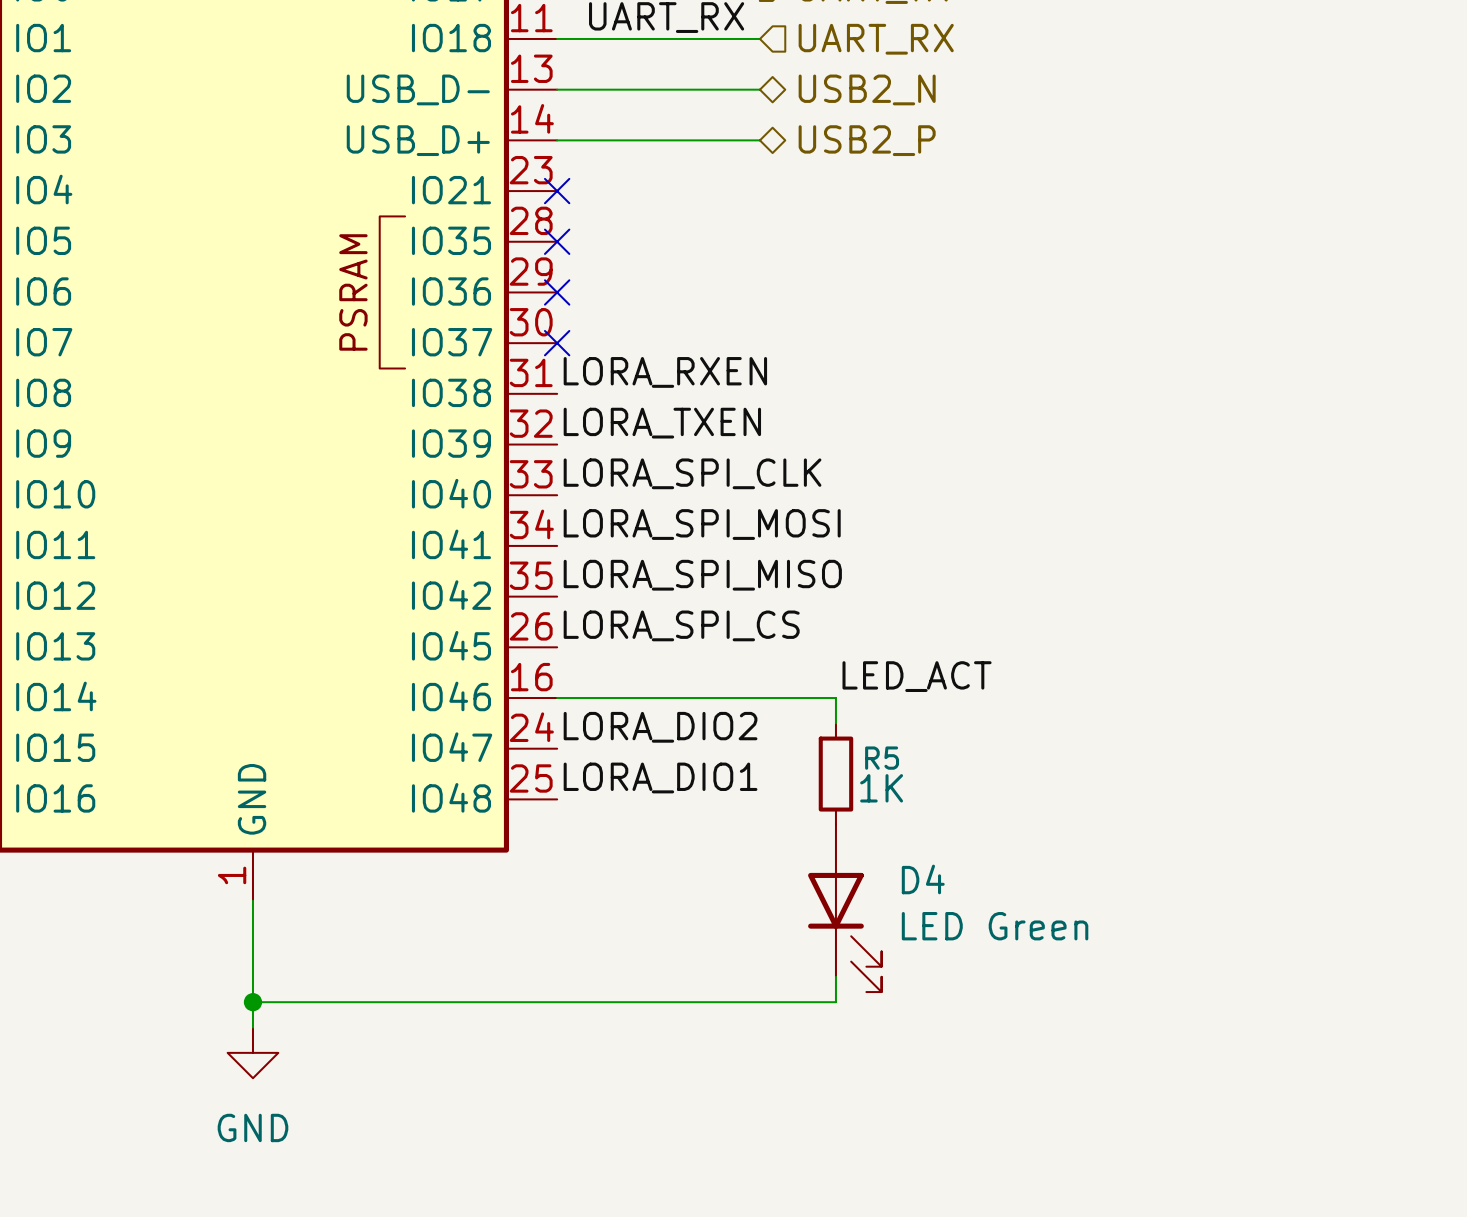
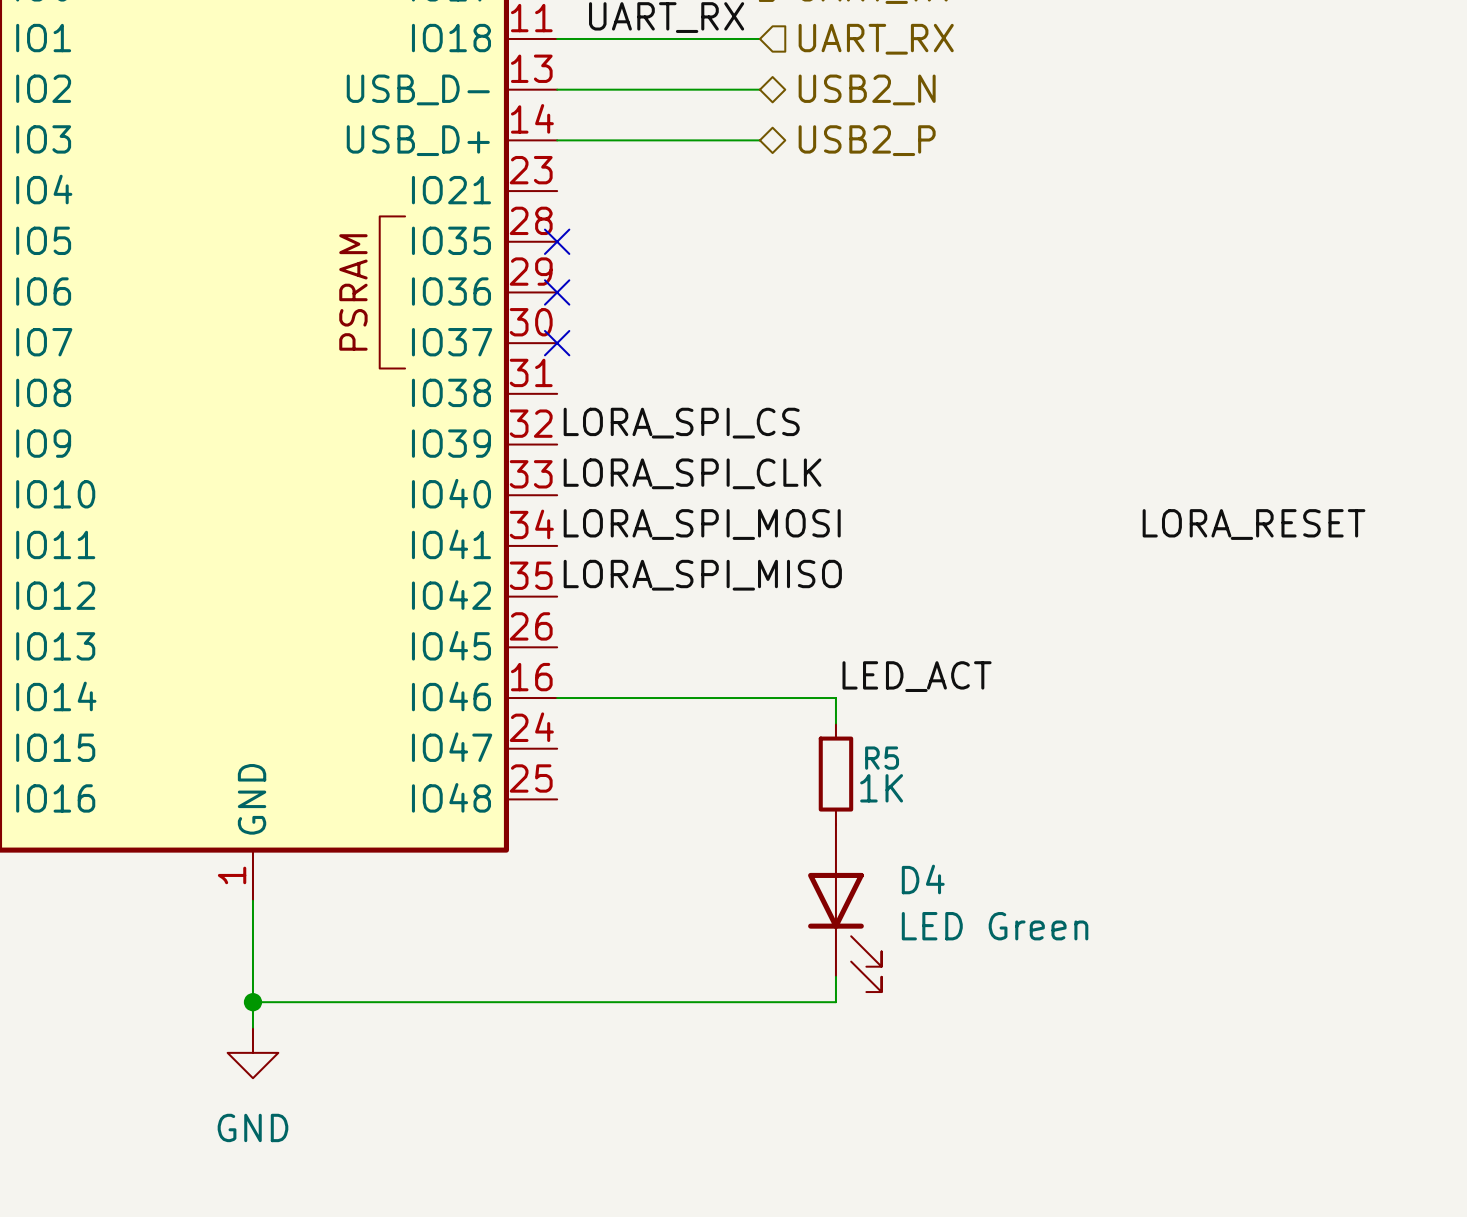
no-connect mark: (557, 191) -> none
label: LORA_RXEN (665, 372) -> none
label: LORA_TXEN (662, 423) -> LORA_SPI_CS (681, 423)
label: none -> LORA_RESET (1254, 524)
label: LORA_SPI_CS (681, 625) -> none
label: LORA_DIO2 (660, 727) -> none
label: LORA_DIO1 (660, 777) -> none

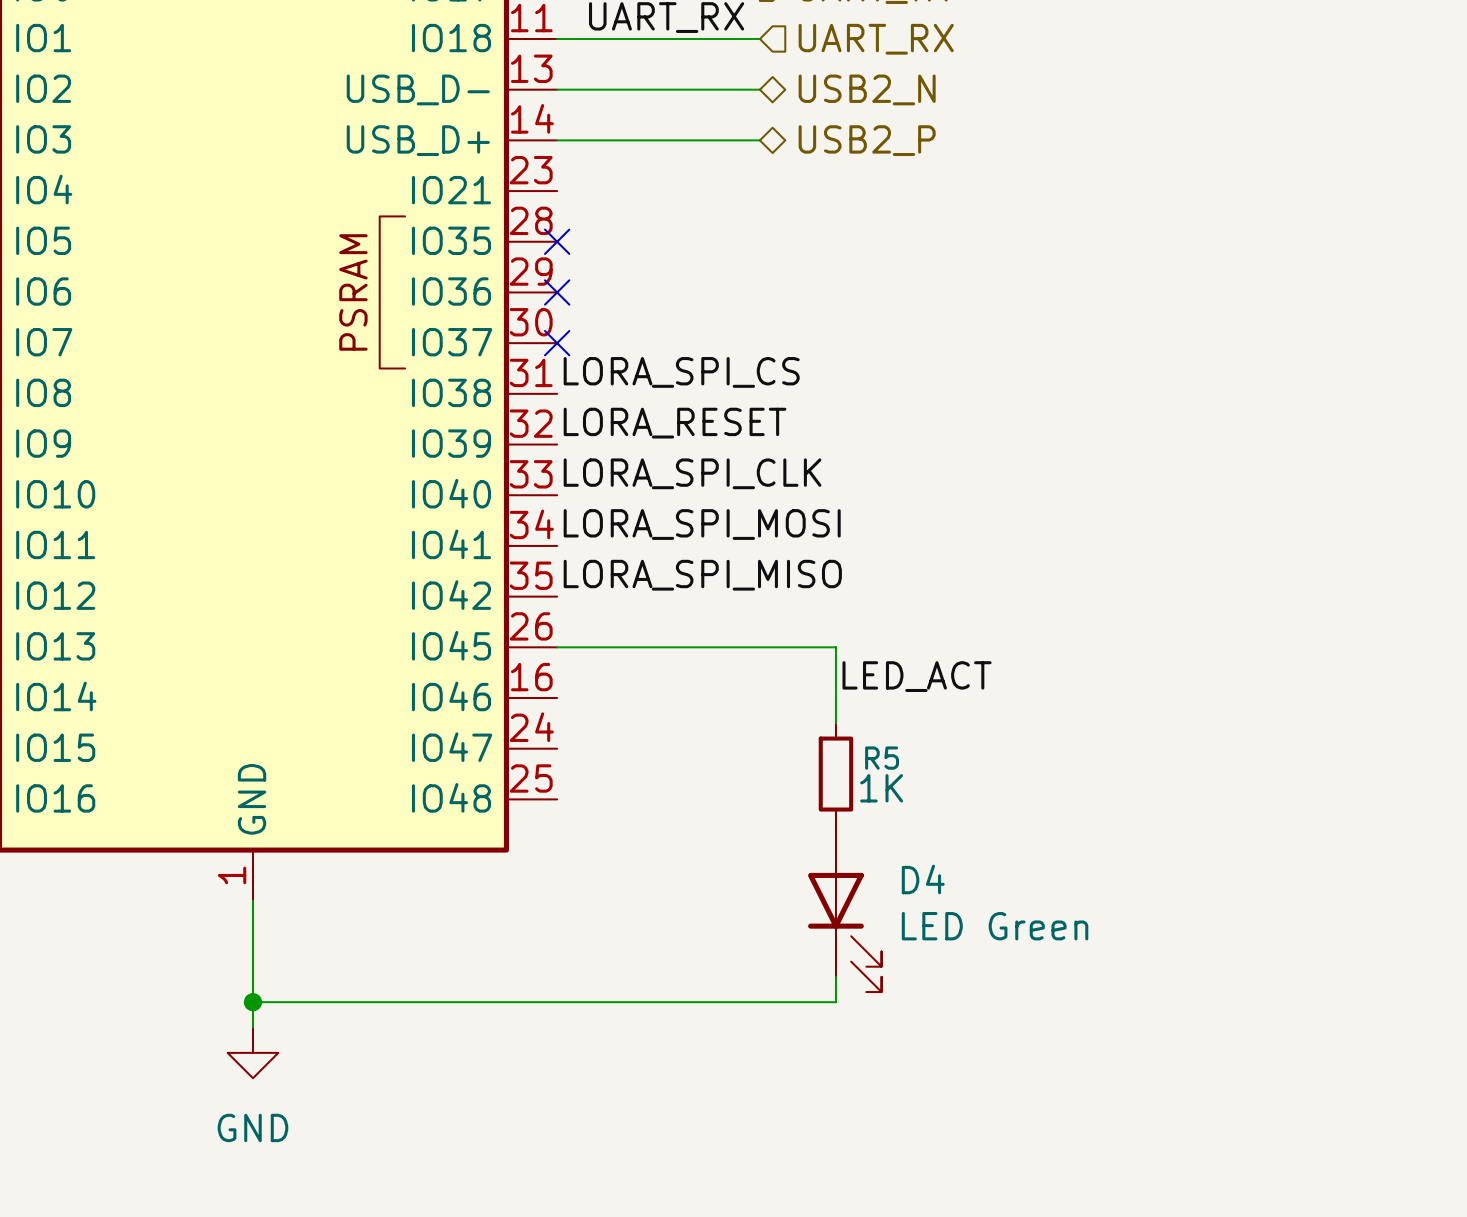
label: none -> LORA_SPI_CS (681, 372)
label: LORA_SPI_CS (681, 423) -> LORA_RESET (675, 423)
label: LORA_RESET (1254, 524) -> none
wire: (557, 698) (835, 698) -> (557, 647) (835, 647) (835, 698)

